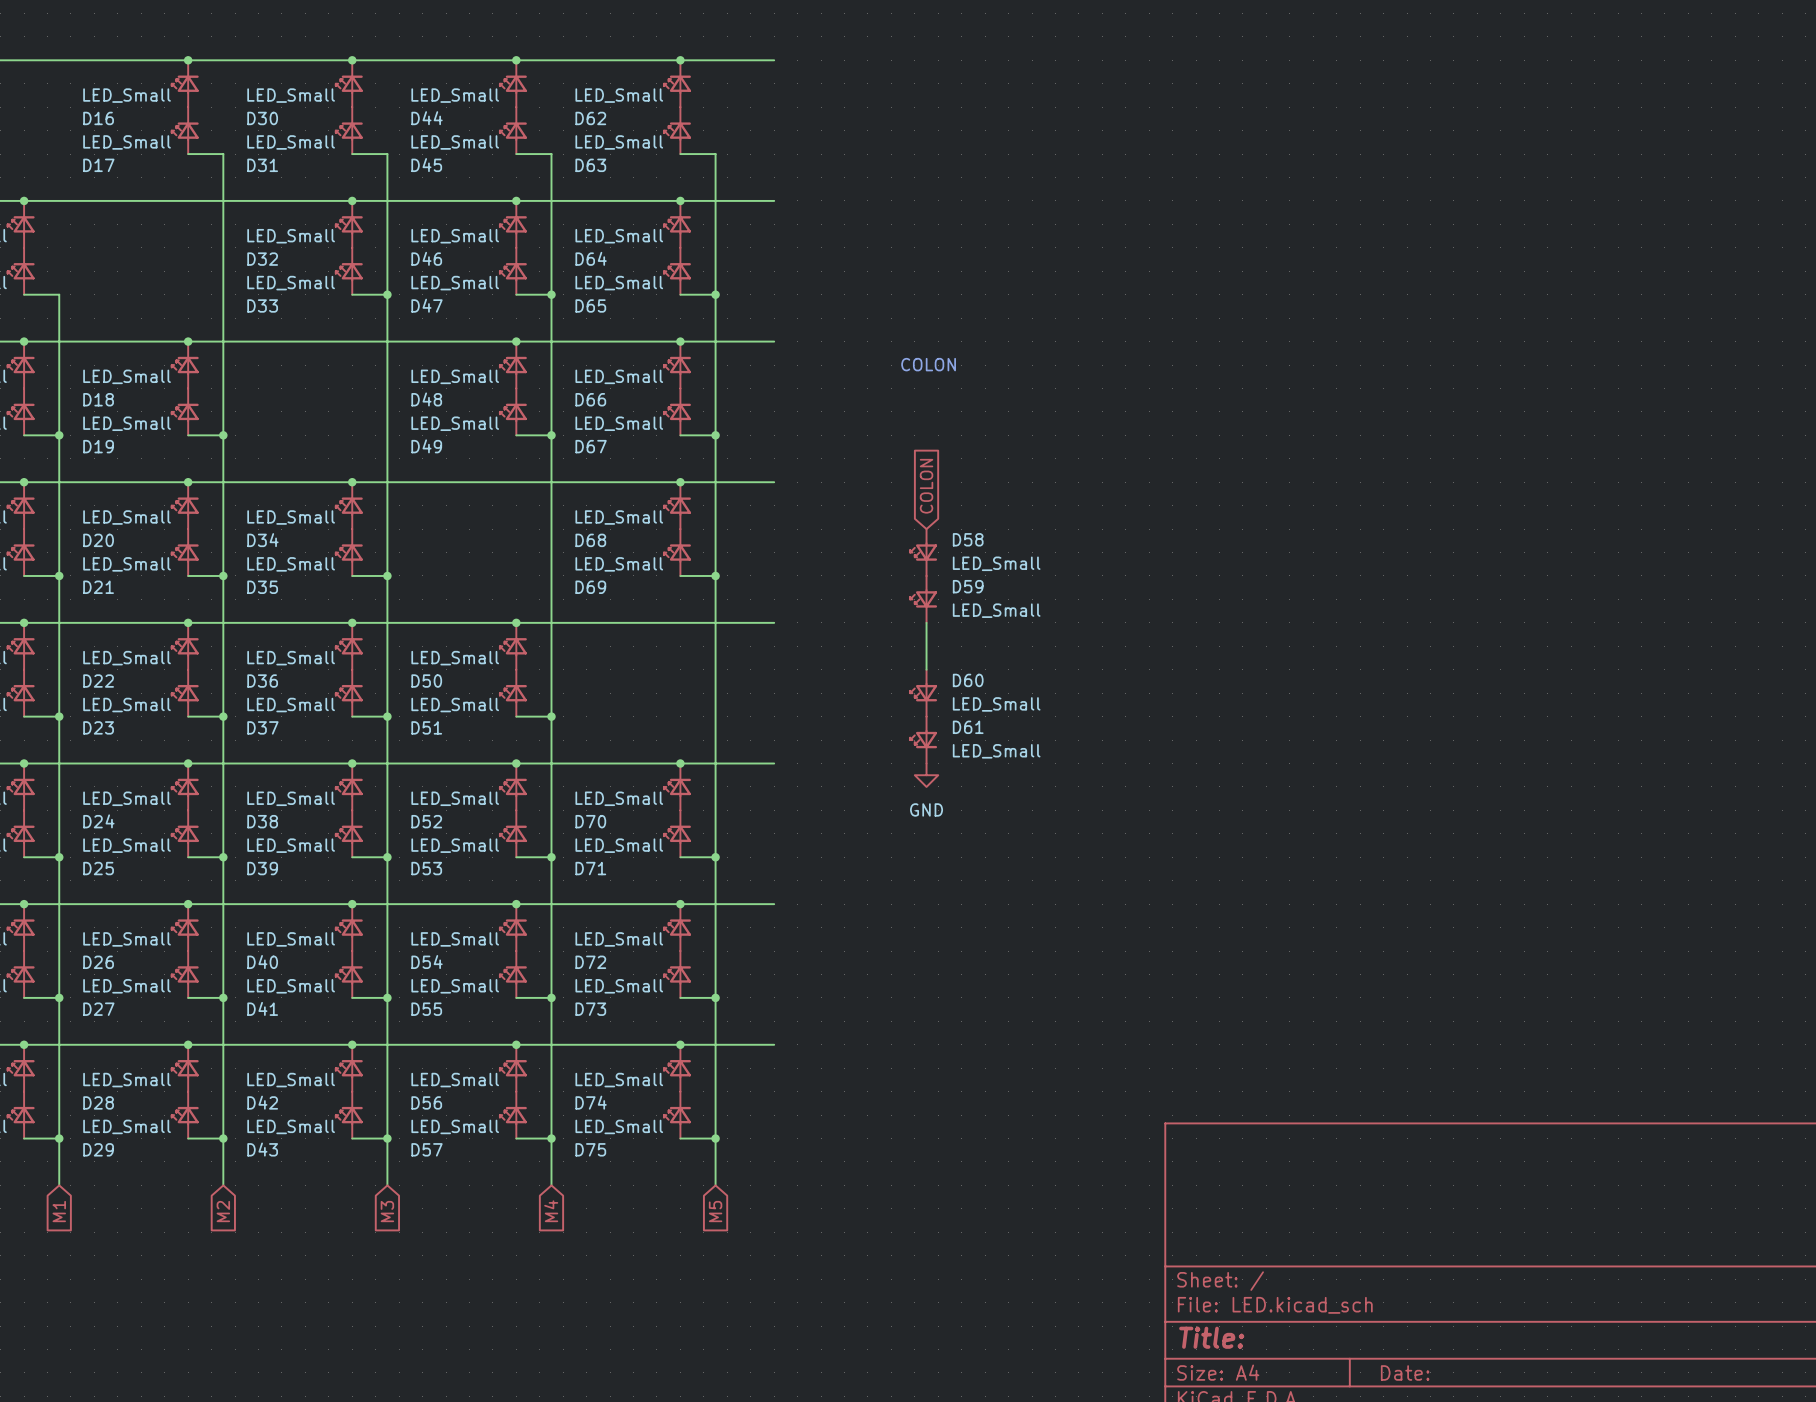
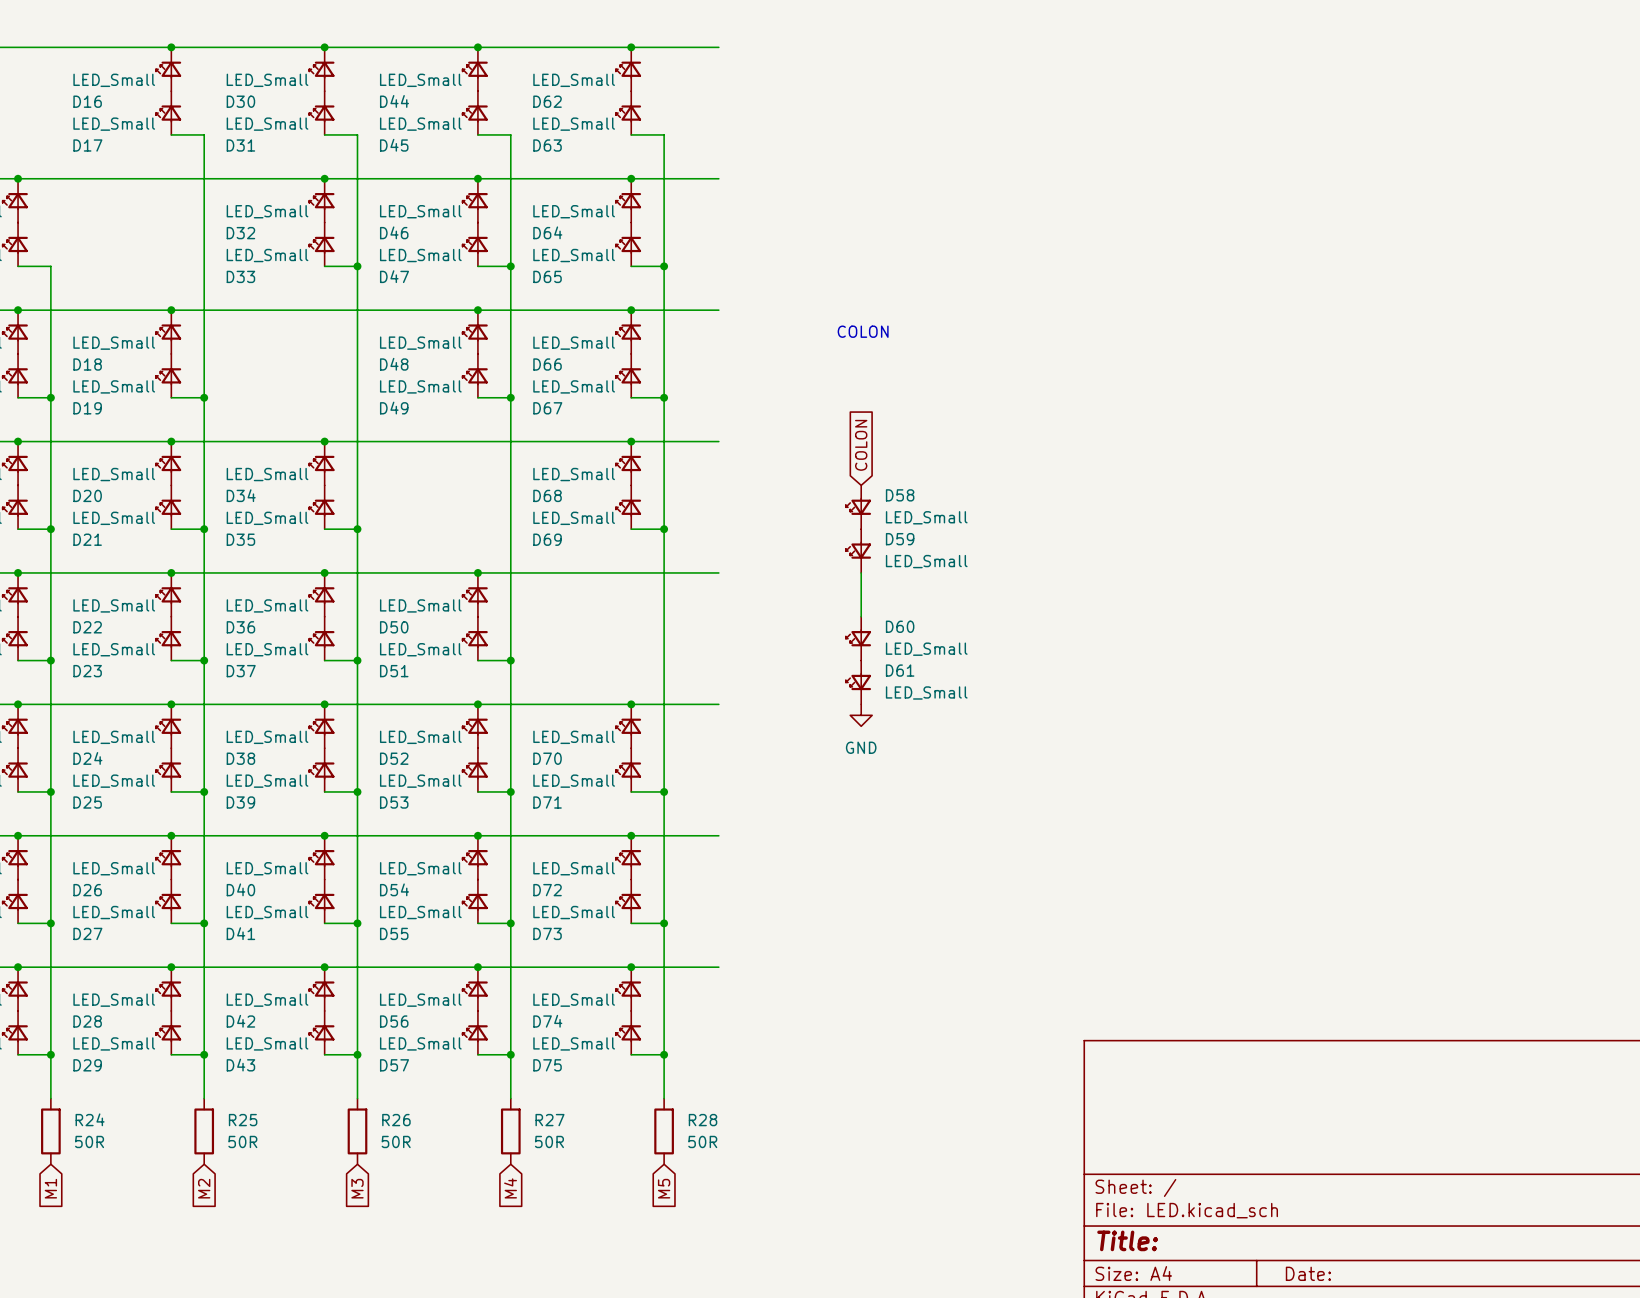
global label position: M1 (59, 1211) -> M1 (50, 1188)
global label position: M2 (223, 1211) -> M2 (204, 1188)
global label position: M3 (387, 1211) -> M3 (357, 1188)
global label position: M4 (551, 1211) -> M4 (510, 1188)
global label position: M5 (715, 1211) -> M5 (664, 1188)
R24: none -> 50R (50, 1131)
R25: none -> 50R (204, 1131)
R26: none -> 50R (357, 1131)
R27: none -> 50R (510, 1131)
R28: none -> 50R (664, 1131)

